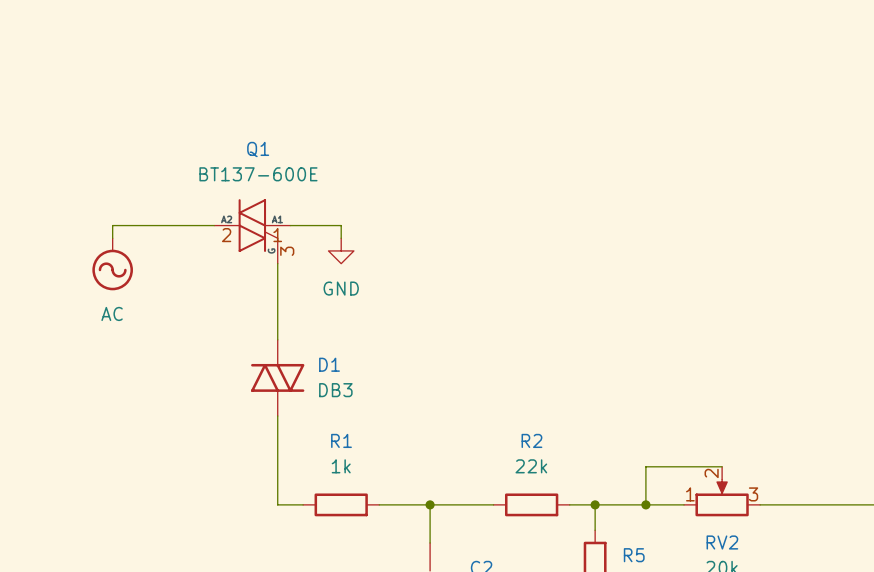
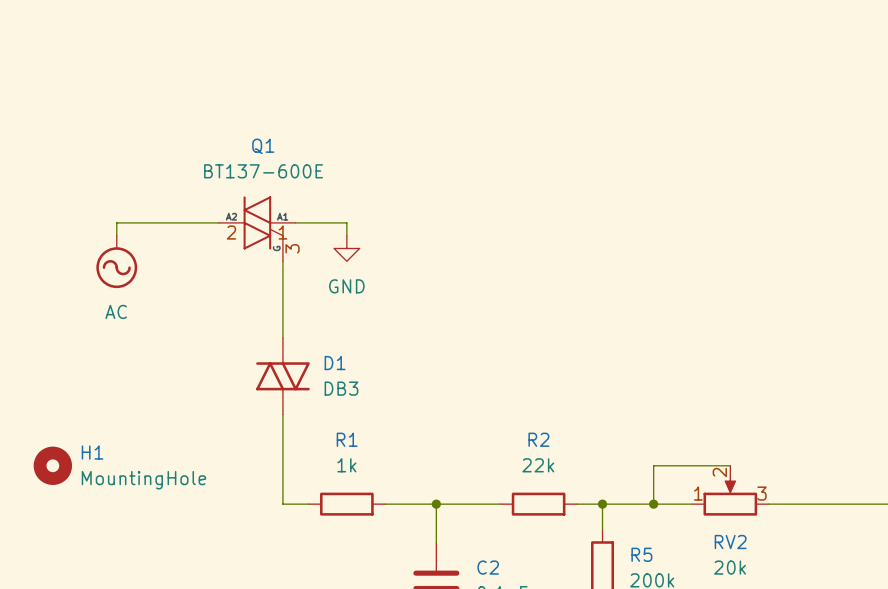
H1: none -> MountingHole (52, 465)

